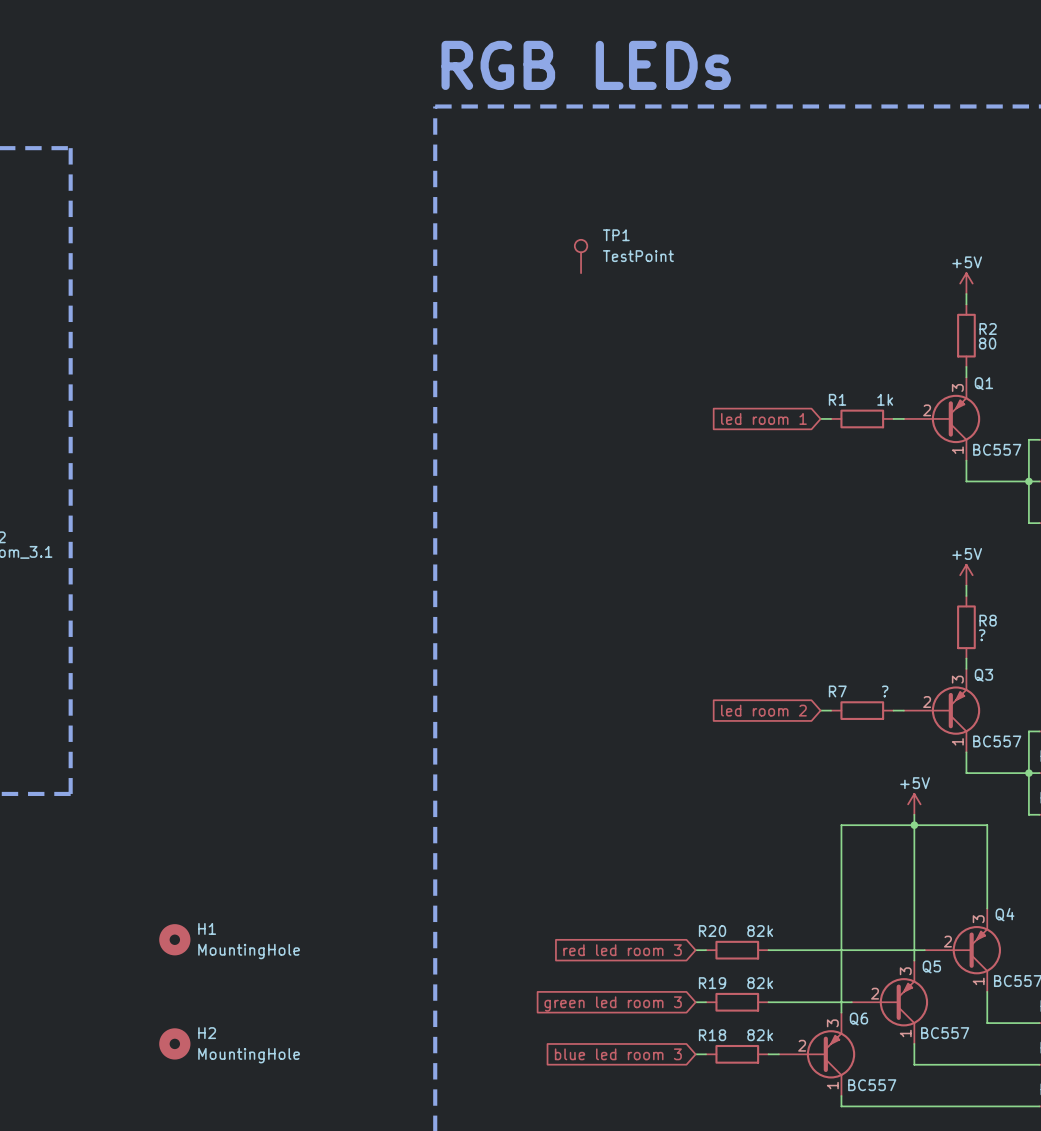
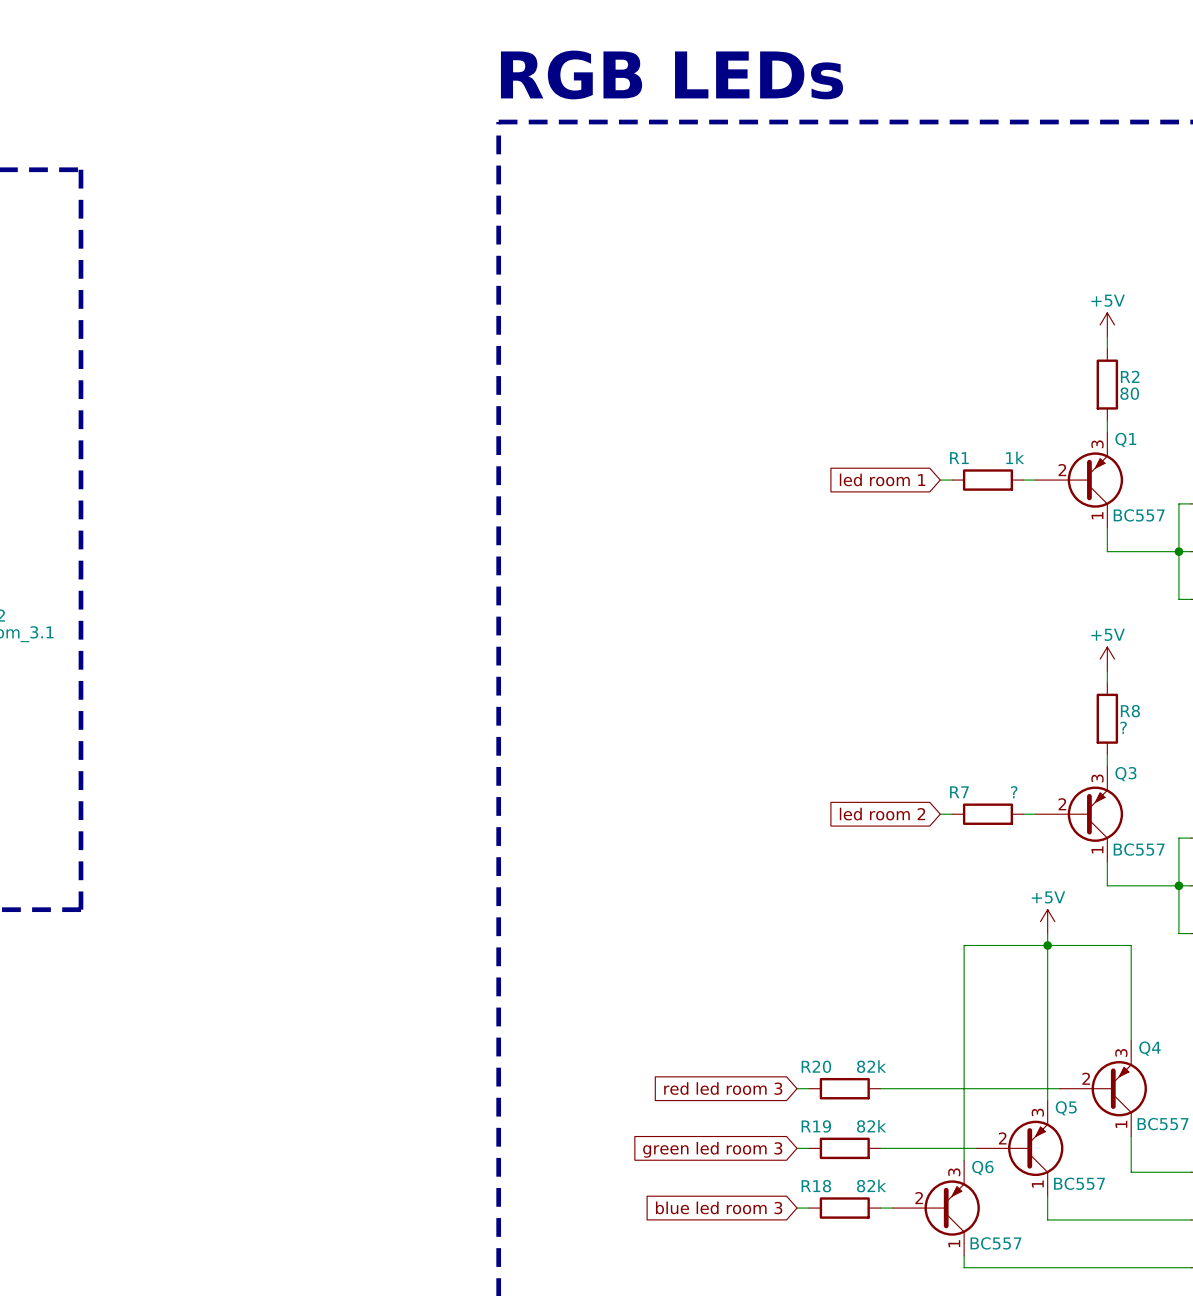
TP1: TestPoint (581, 256) -> none
H1: MountingHole (174, 939) -> none
H2: MountingHole (174, 1043) -> none

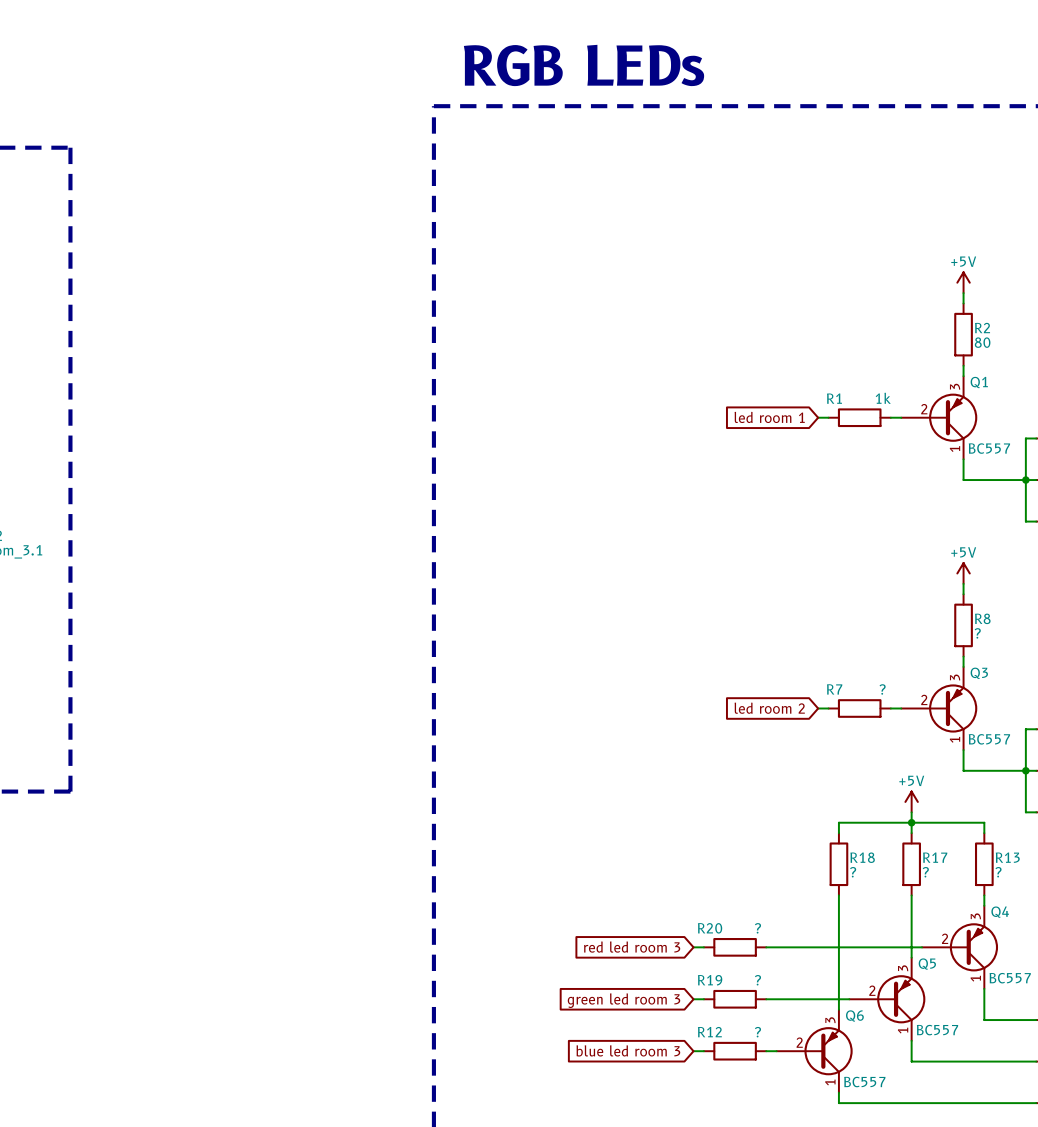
wire: (964, 957) (964, 1029) -> none
wire: (1047, 957) (1047, 1029) -> none
wire: (1131, 957) (1131, 1029) -> none
R18: none -> ? (838, 864)
R17: none -> ? (911, 864)
R13: none -> ? (984, 864)
R20 value: 82k (871, 1066) -> ? (757, 928)
R19 value: 82k (871, 1126) -> ? (757, 980)
R18 value: 82k (871, 1185) -> ? (757, 1032)
R18 name: R18 (816, 1186) -> R12 (709, 1032)

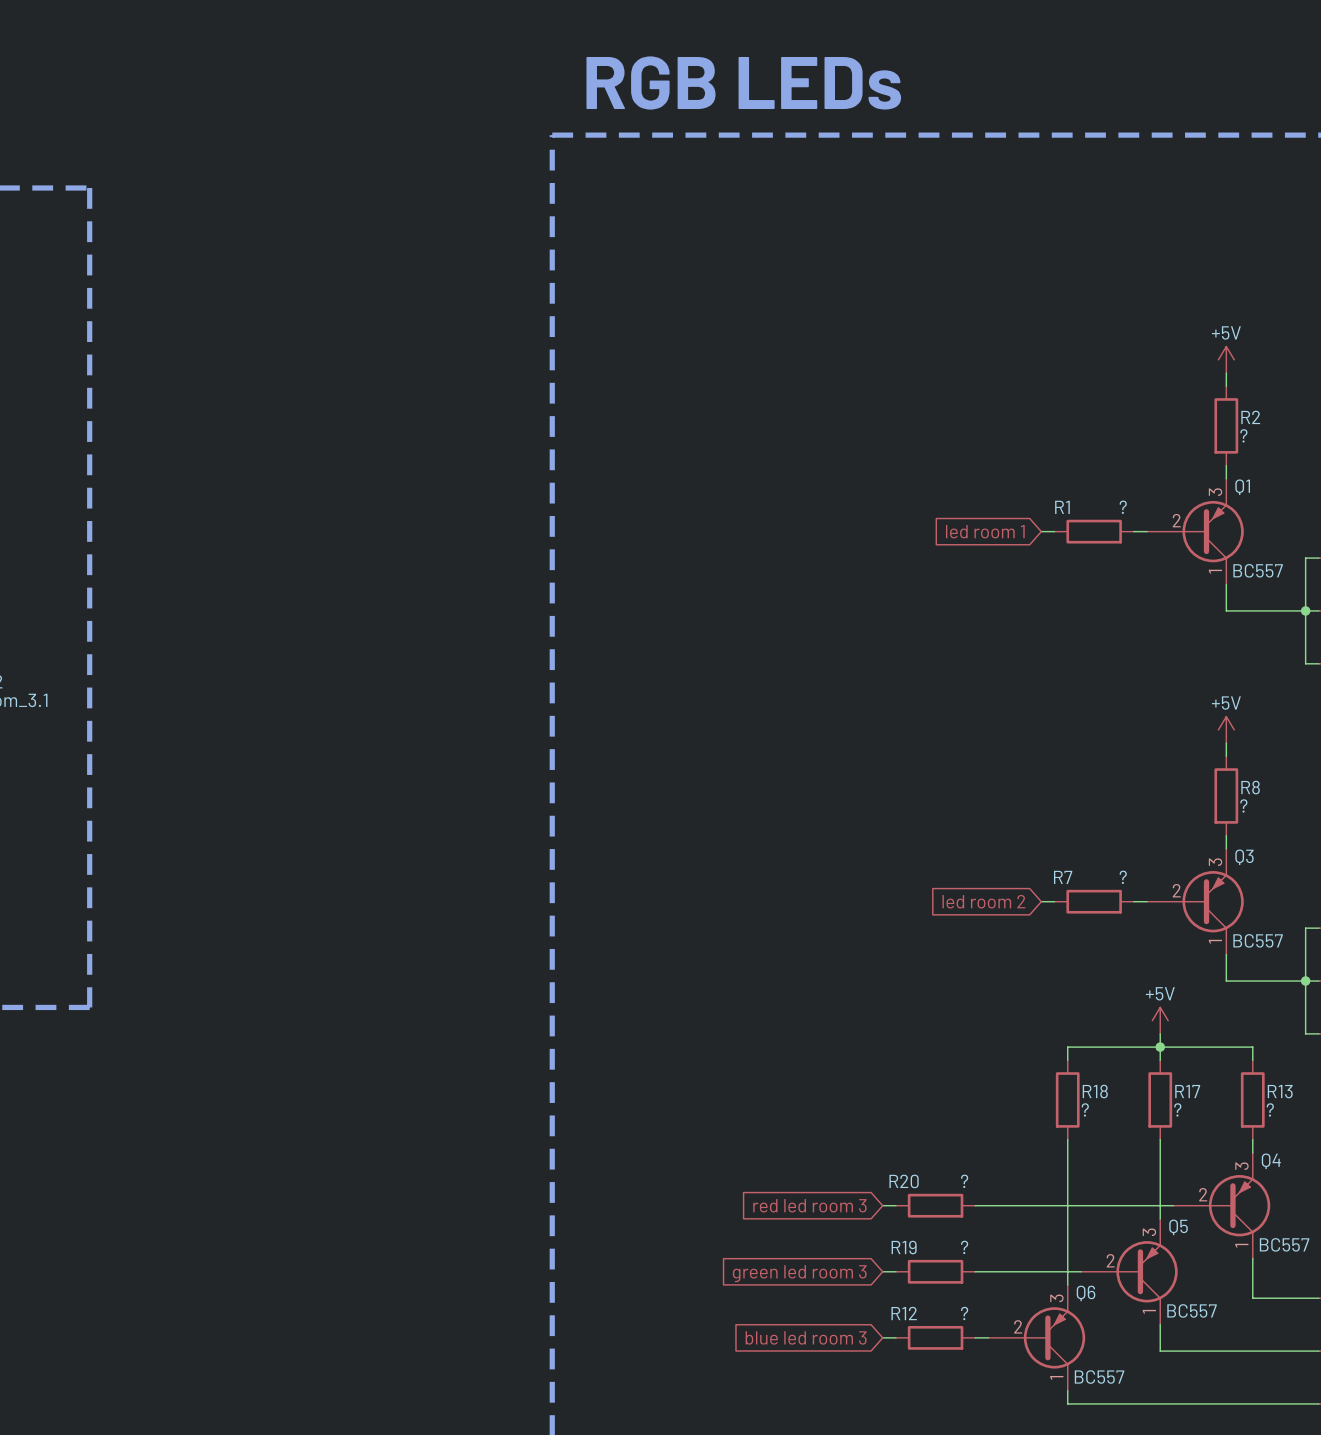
R2 value: 80 (982, 342) -> ? (1243, 435)
R1 value: 1k (883, 398) -> ? (1123, 507)

